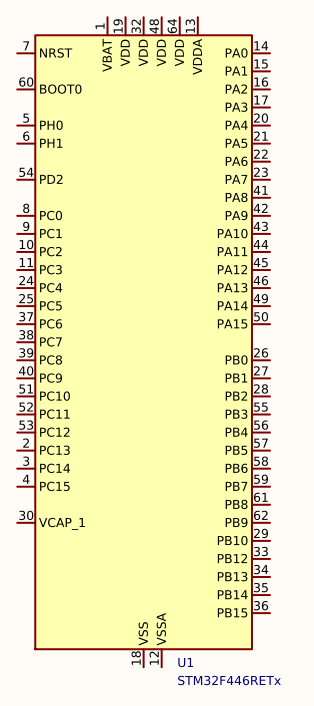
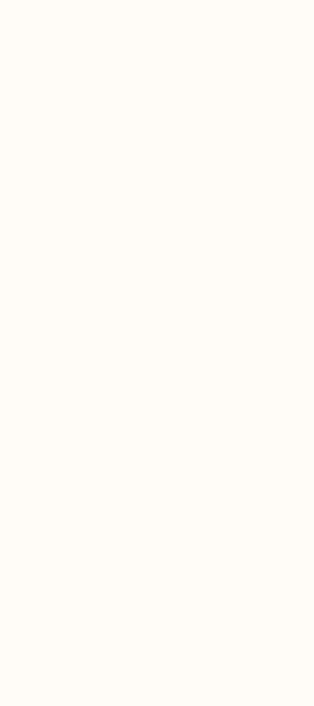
U1: STM32F446RETx (143, 342) -> none

